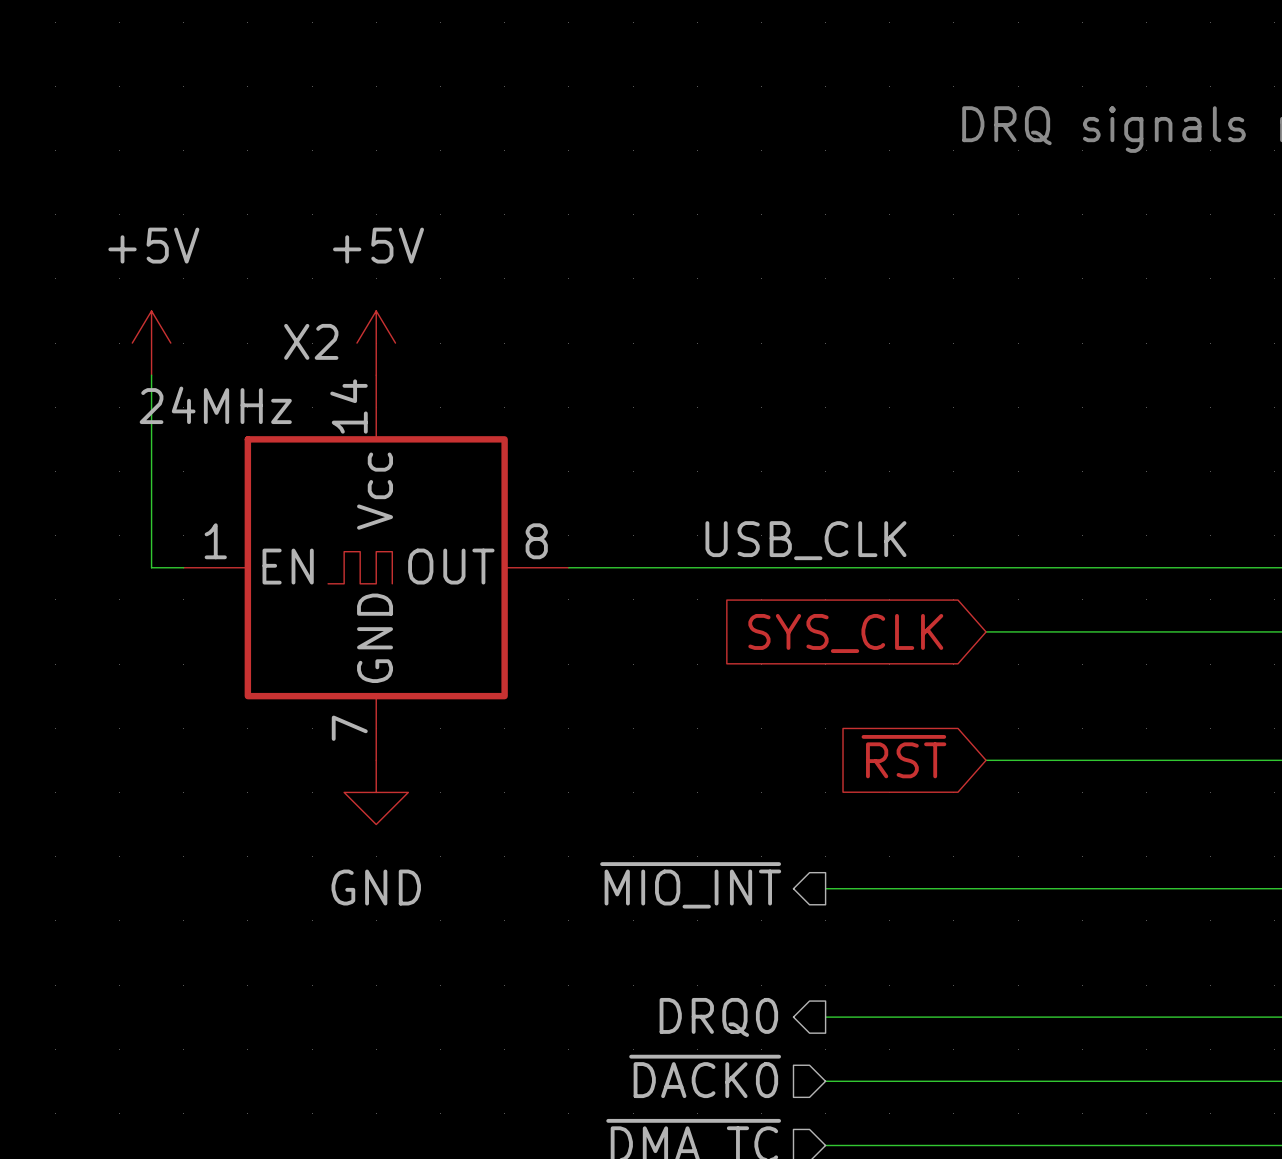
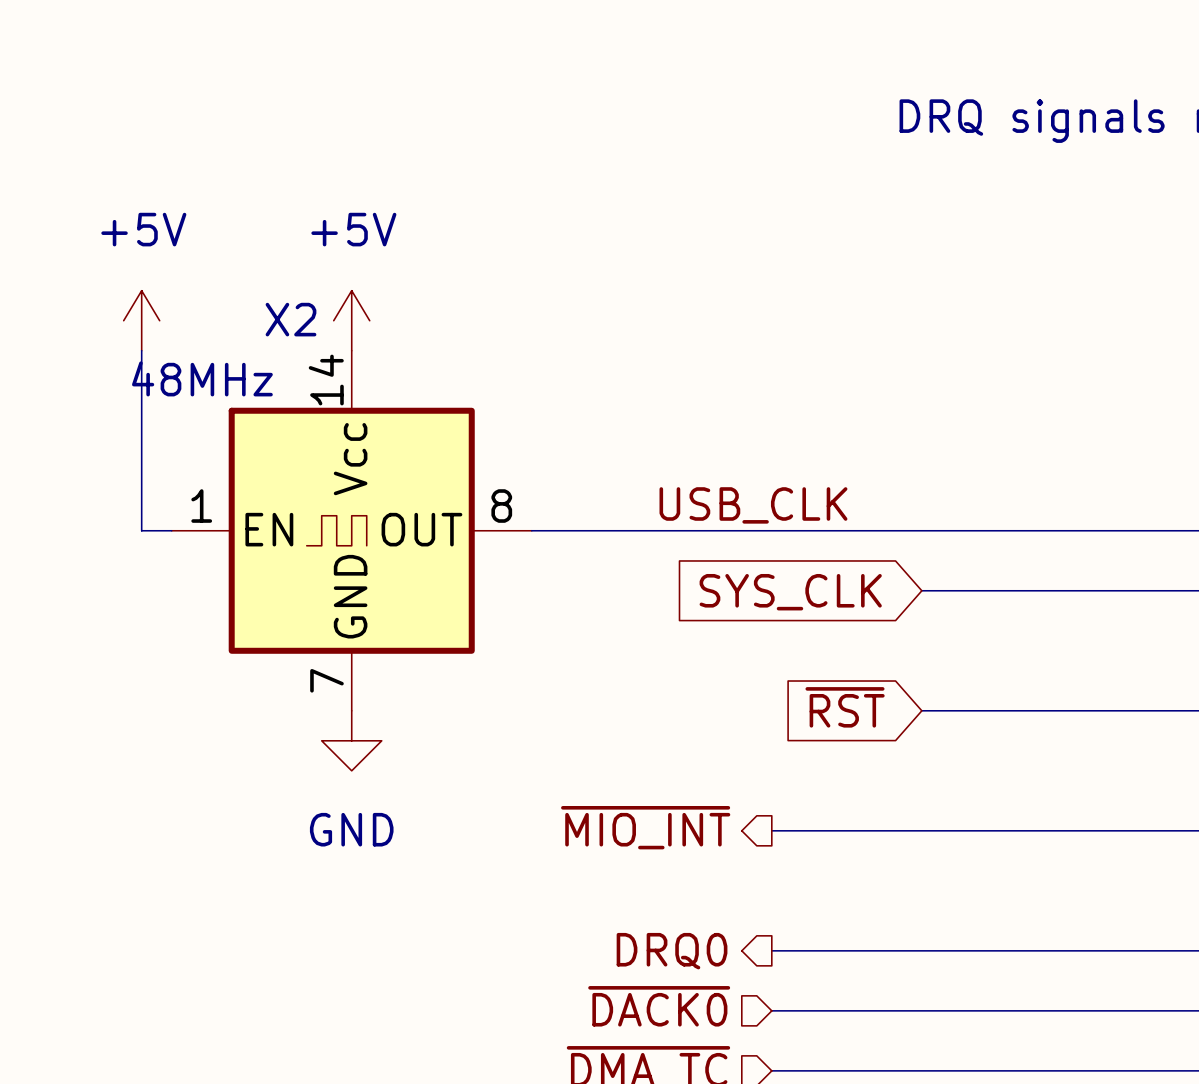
X2 value: 24MHz (215, 405) -> 48MHz (202, 378)

